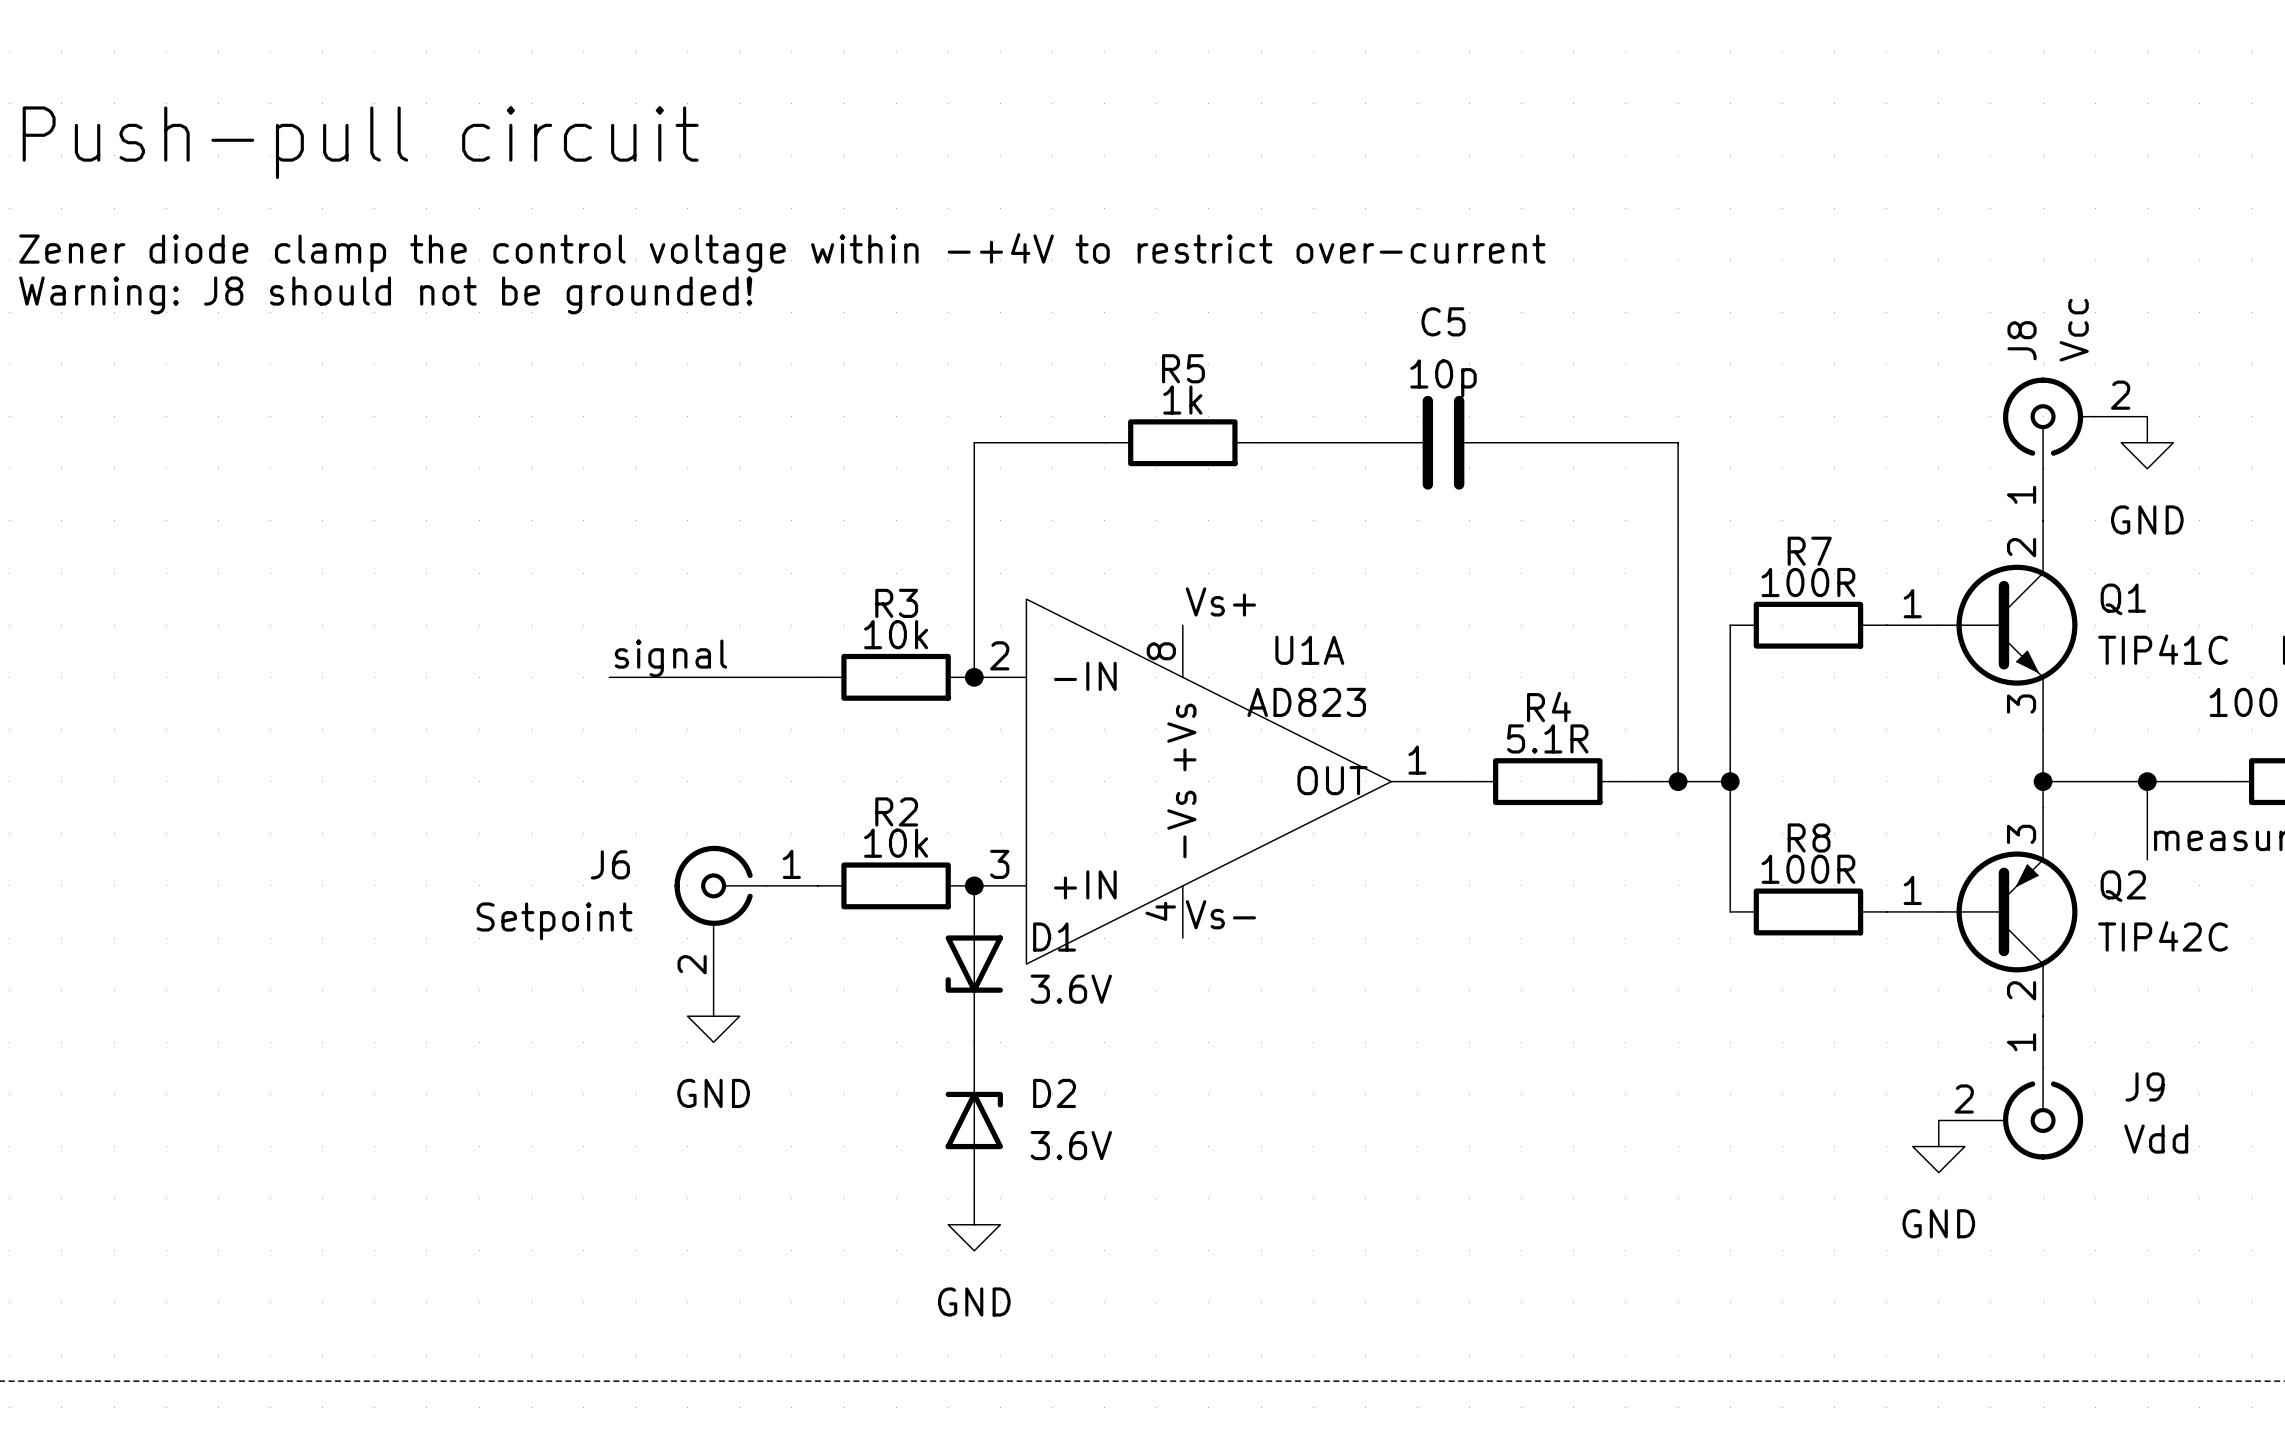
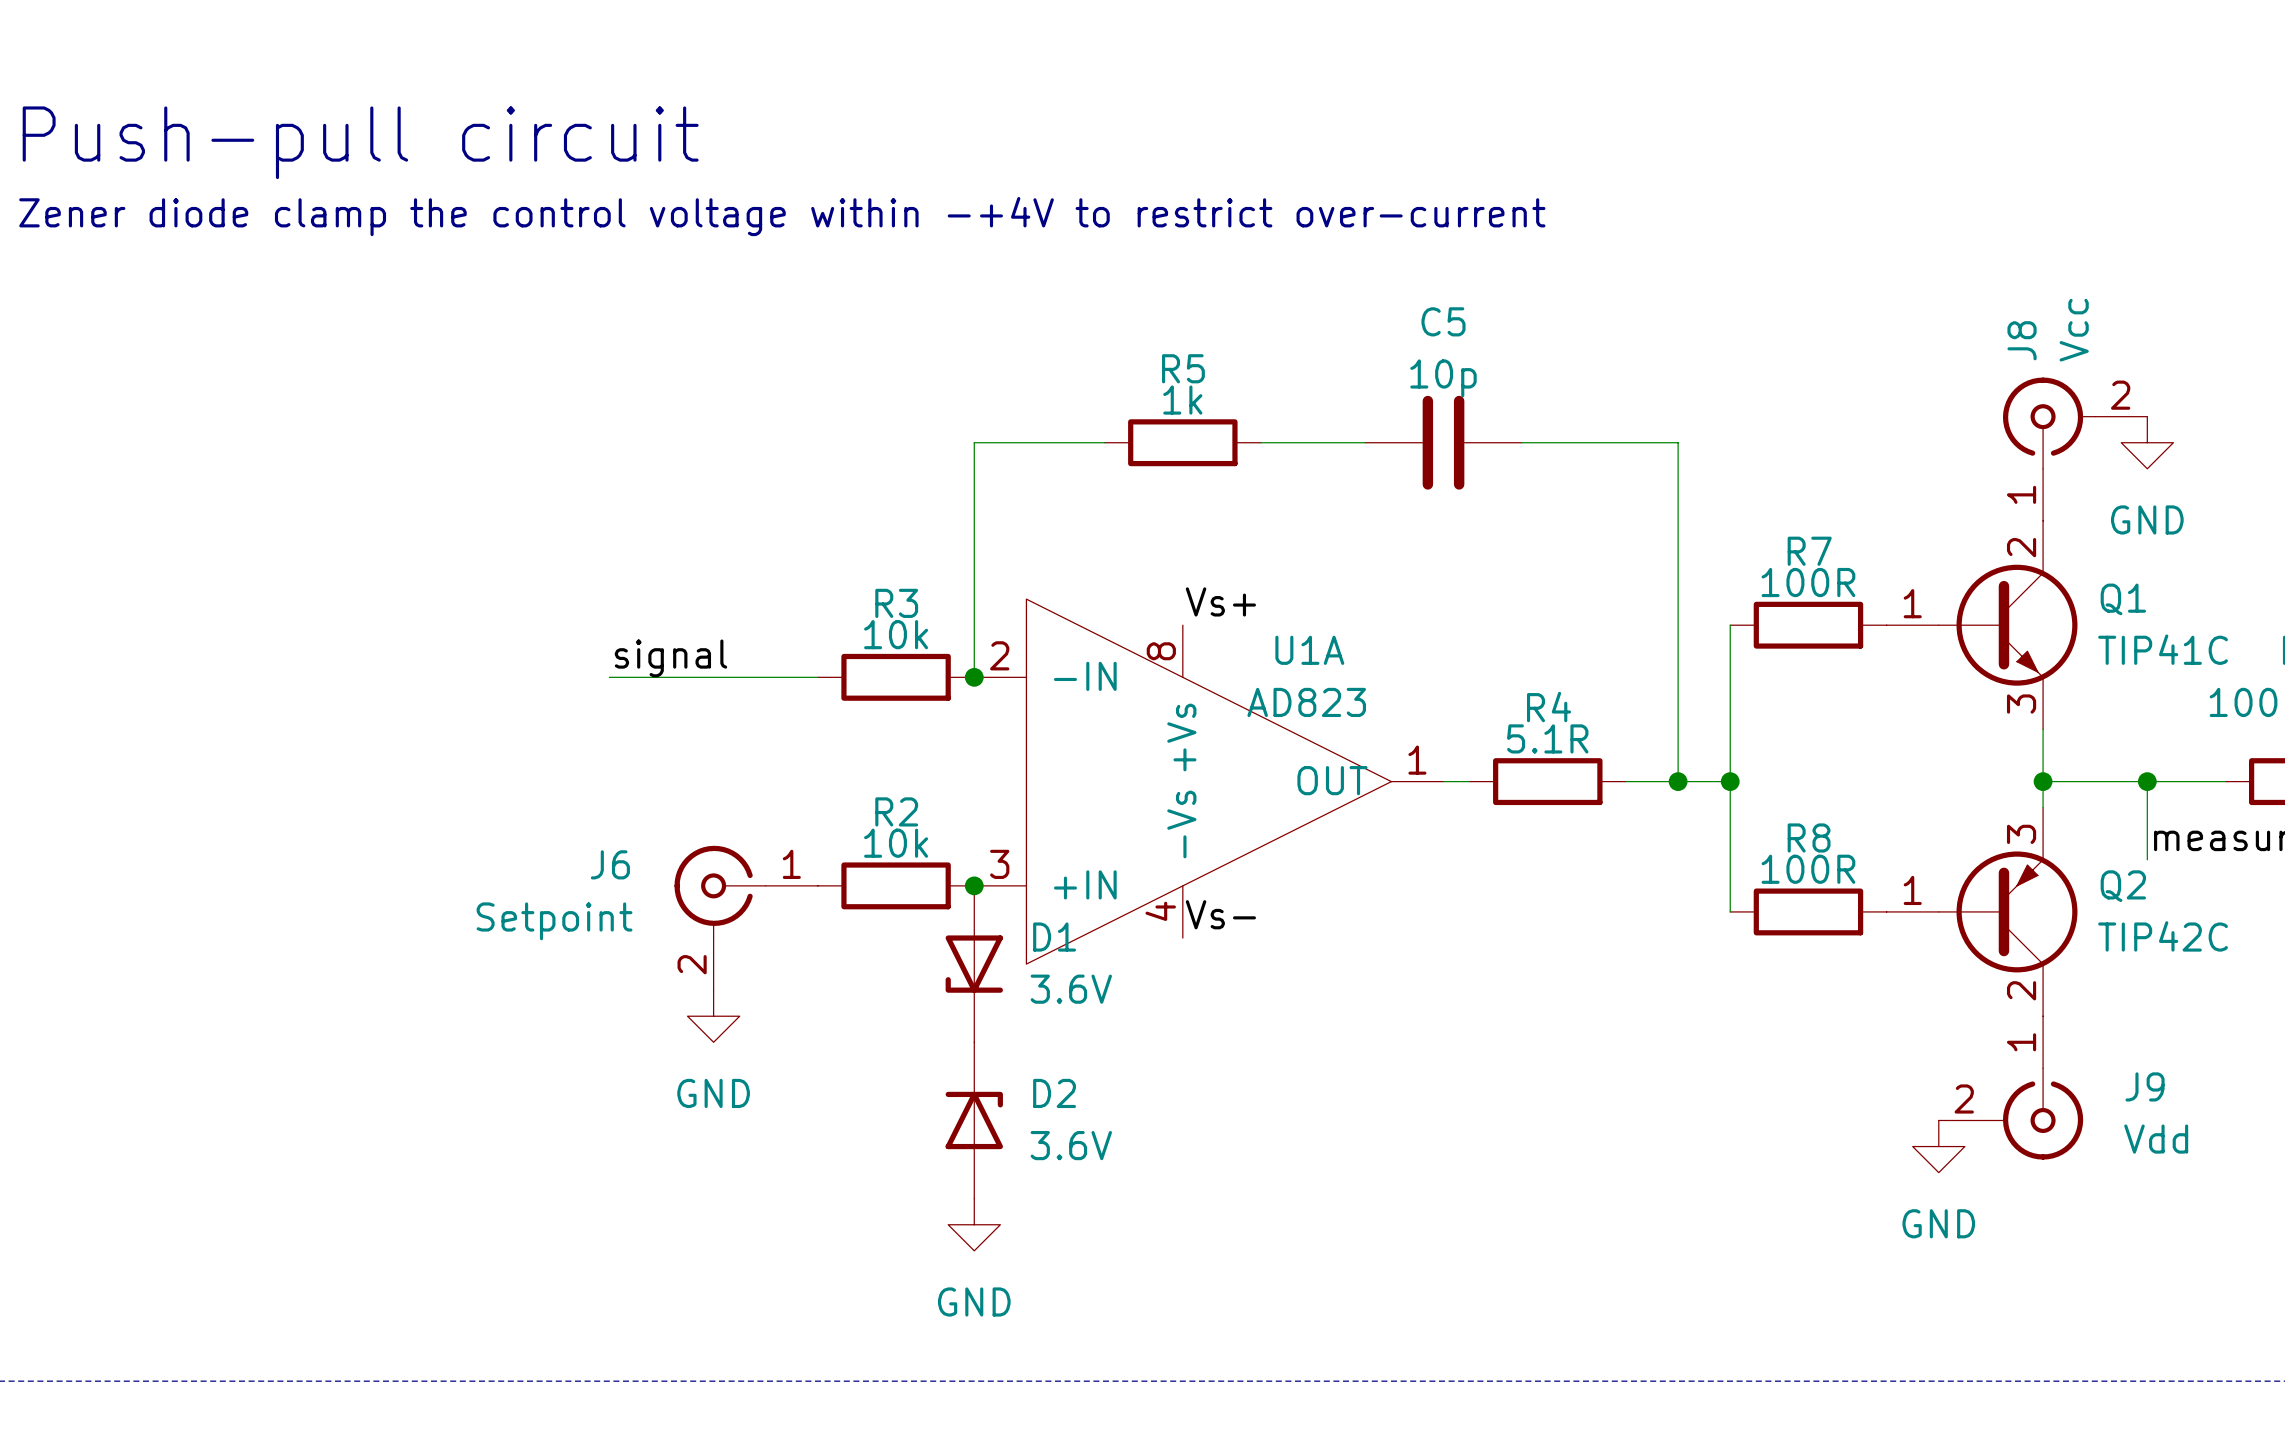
text position: Zener diode clamp the control voltage within -+4V to restrict over-current (782, 252) -> Zener diode clamp the control voltage within -+4V to restrict over-current (782, 216)
text: Warning: J8 should not be grounded! (385, 295) -> none

